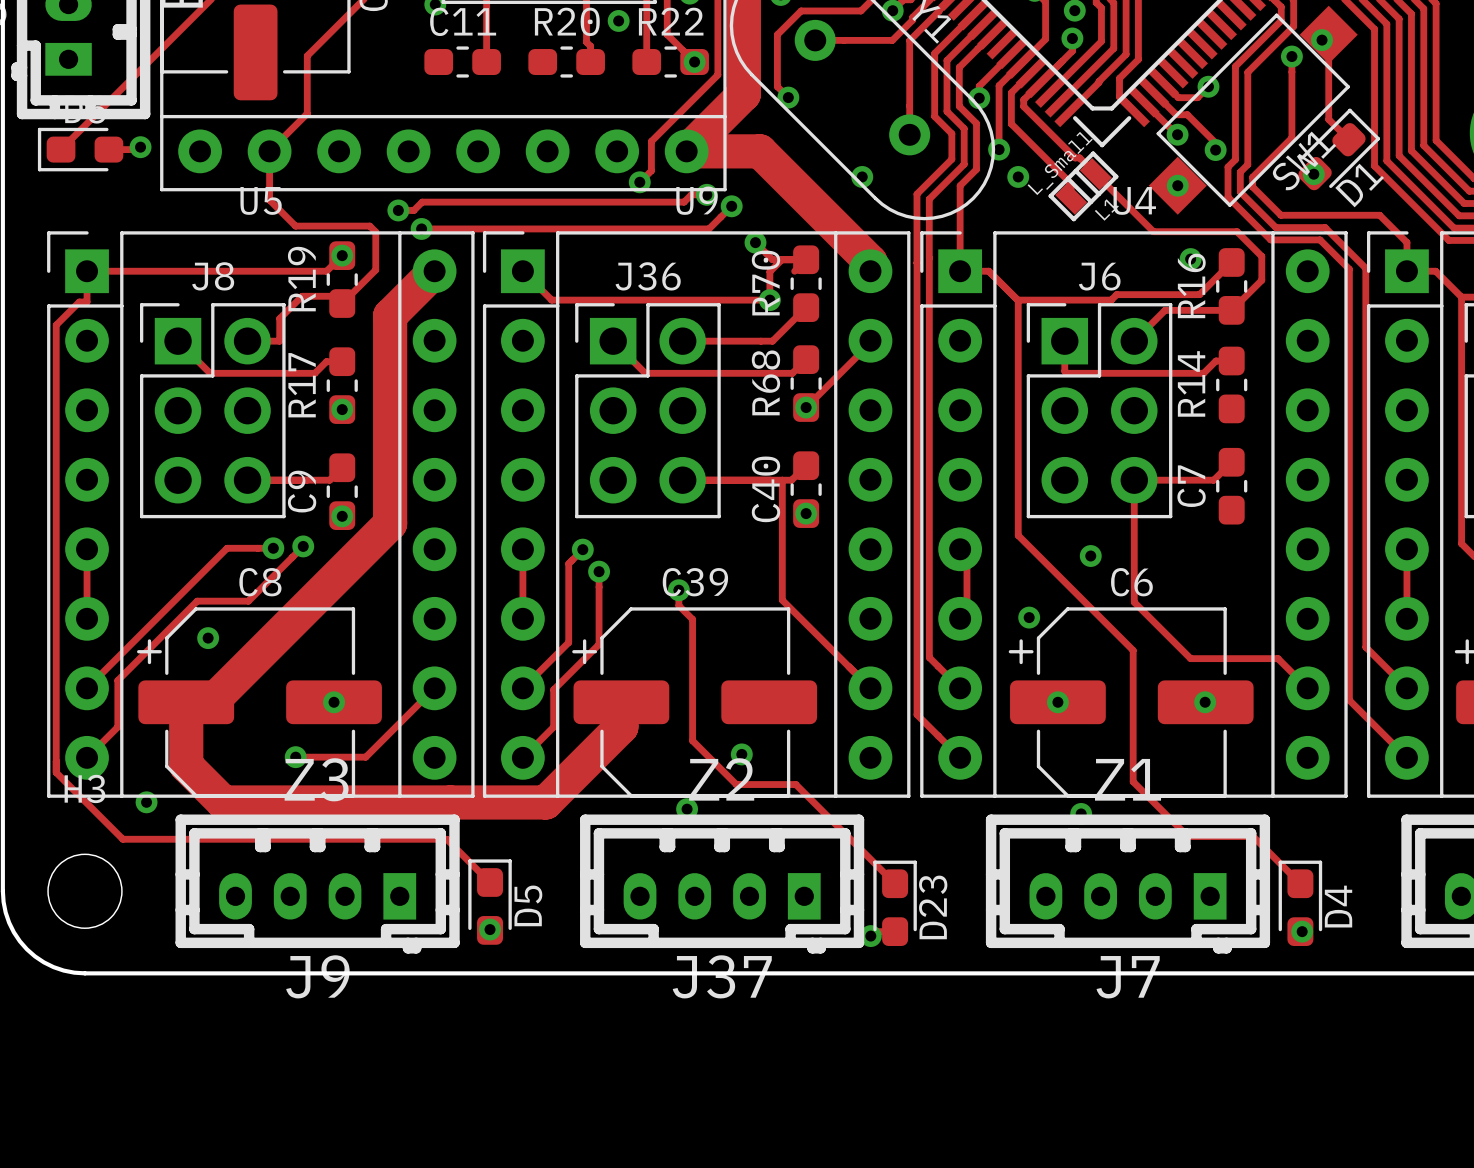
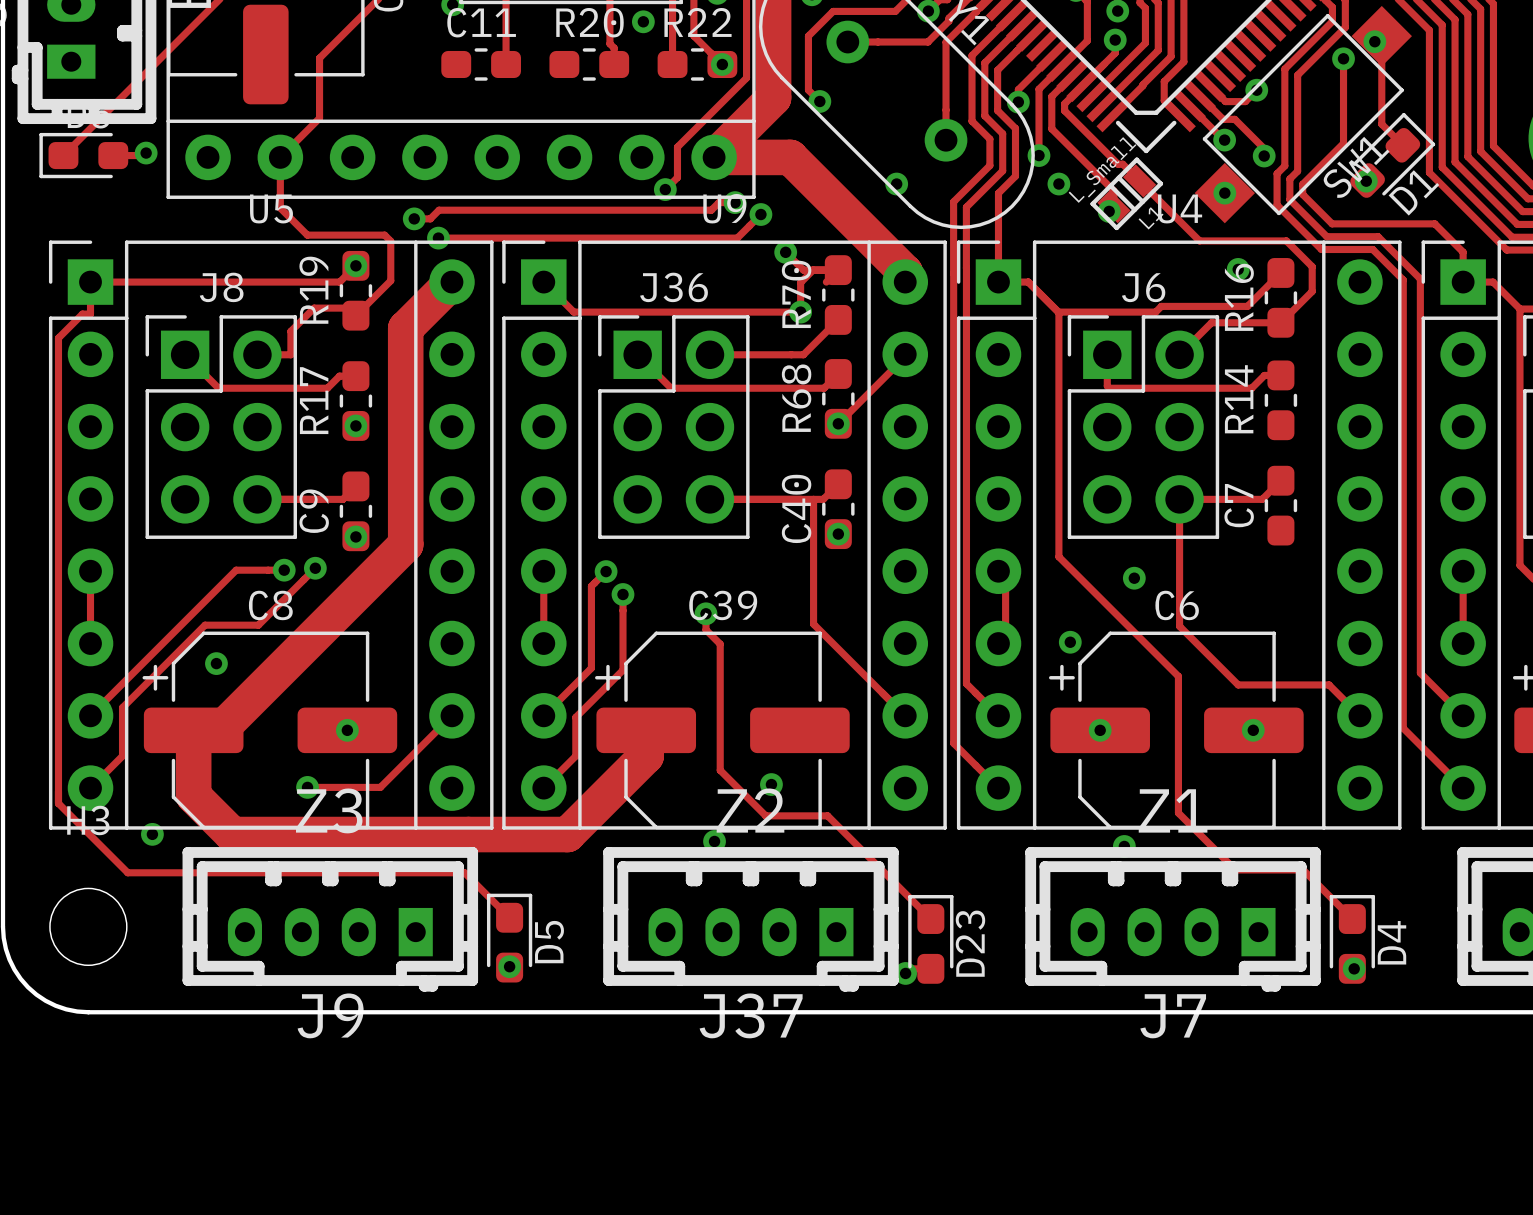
via: none -> (1109, 211)

